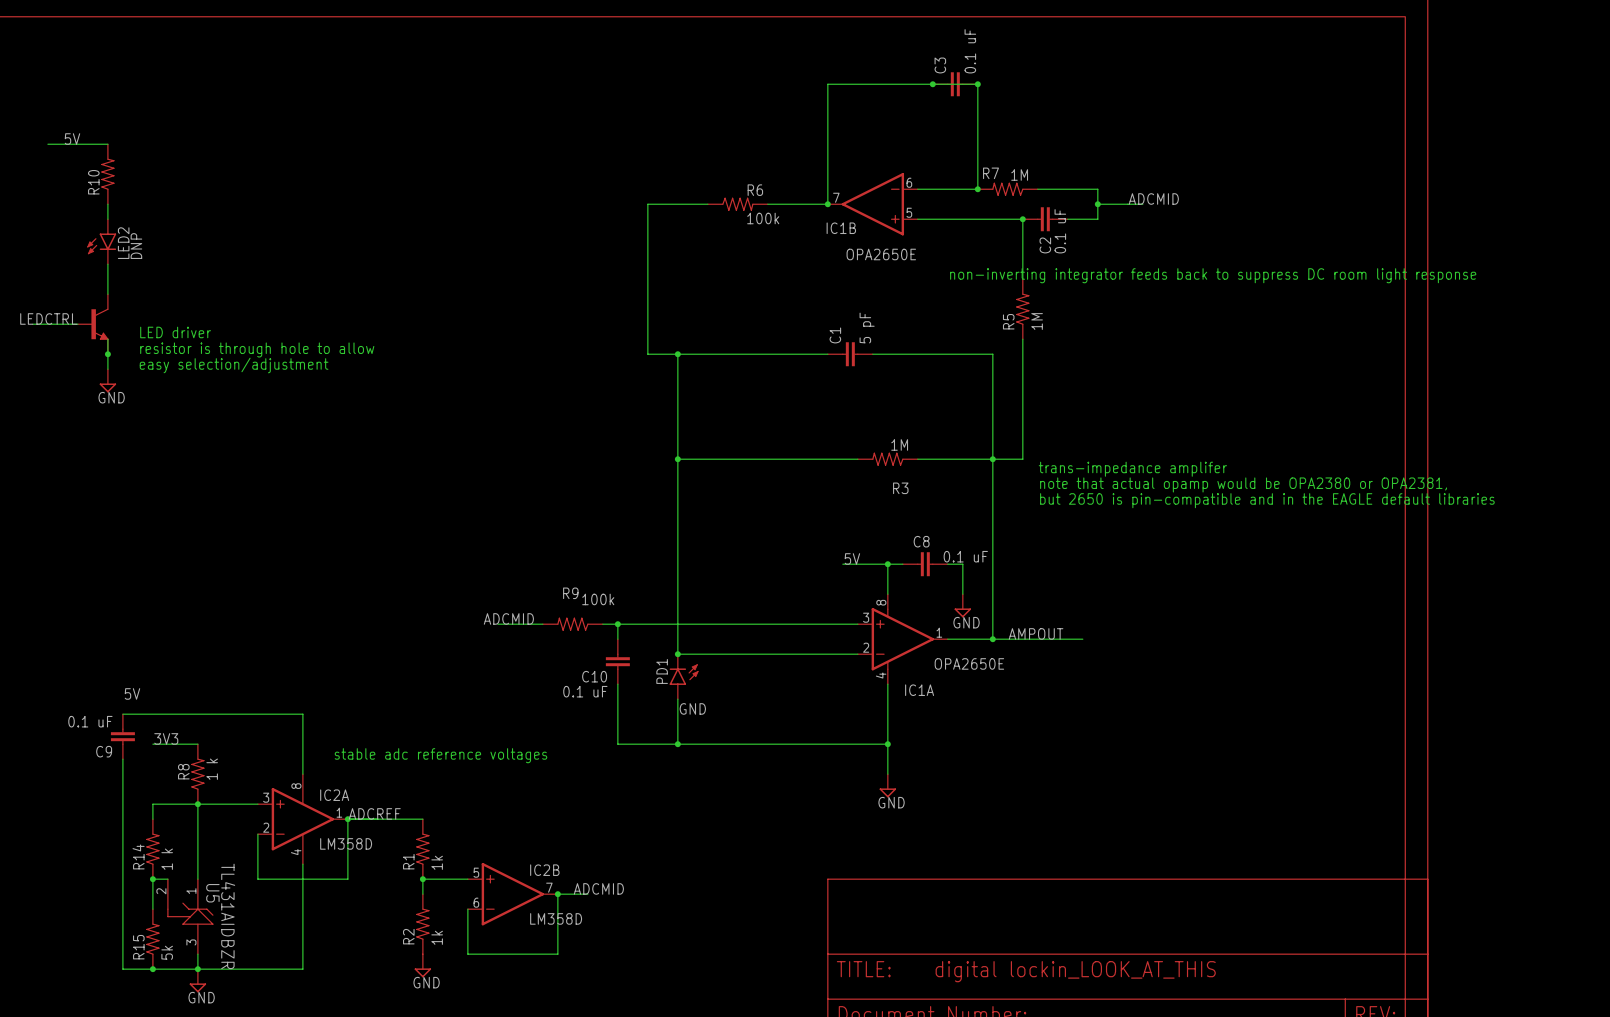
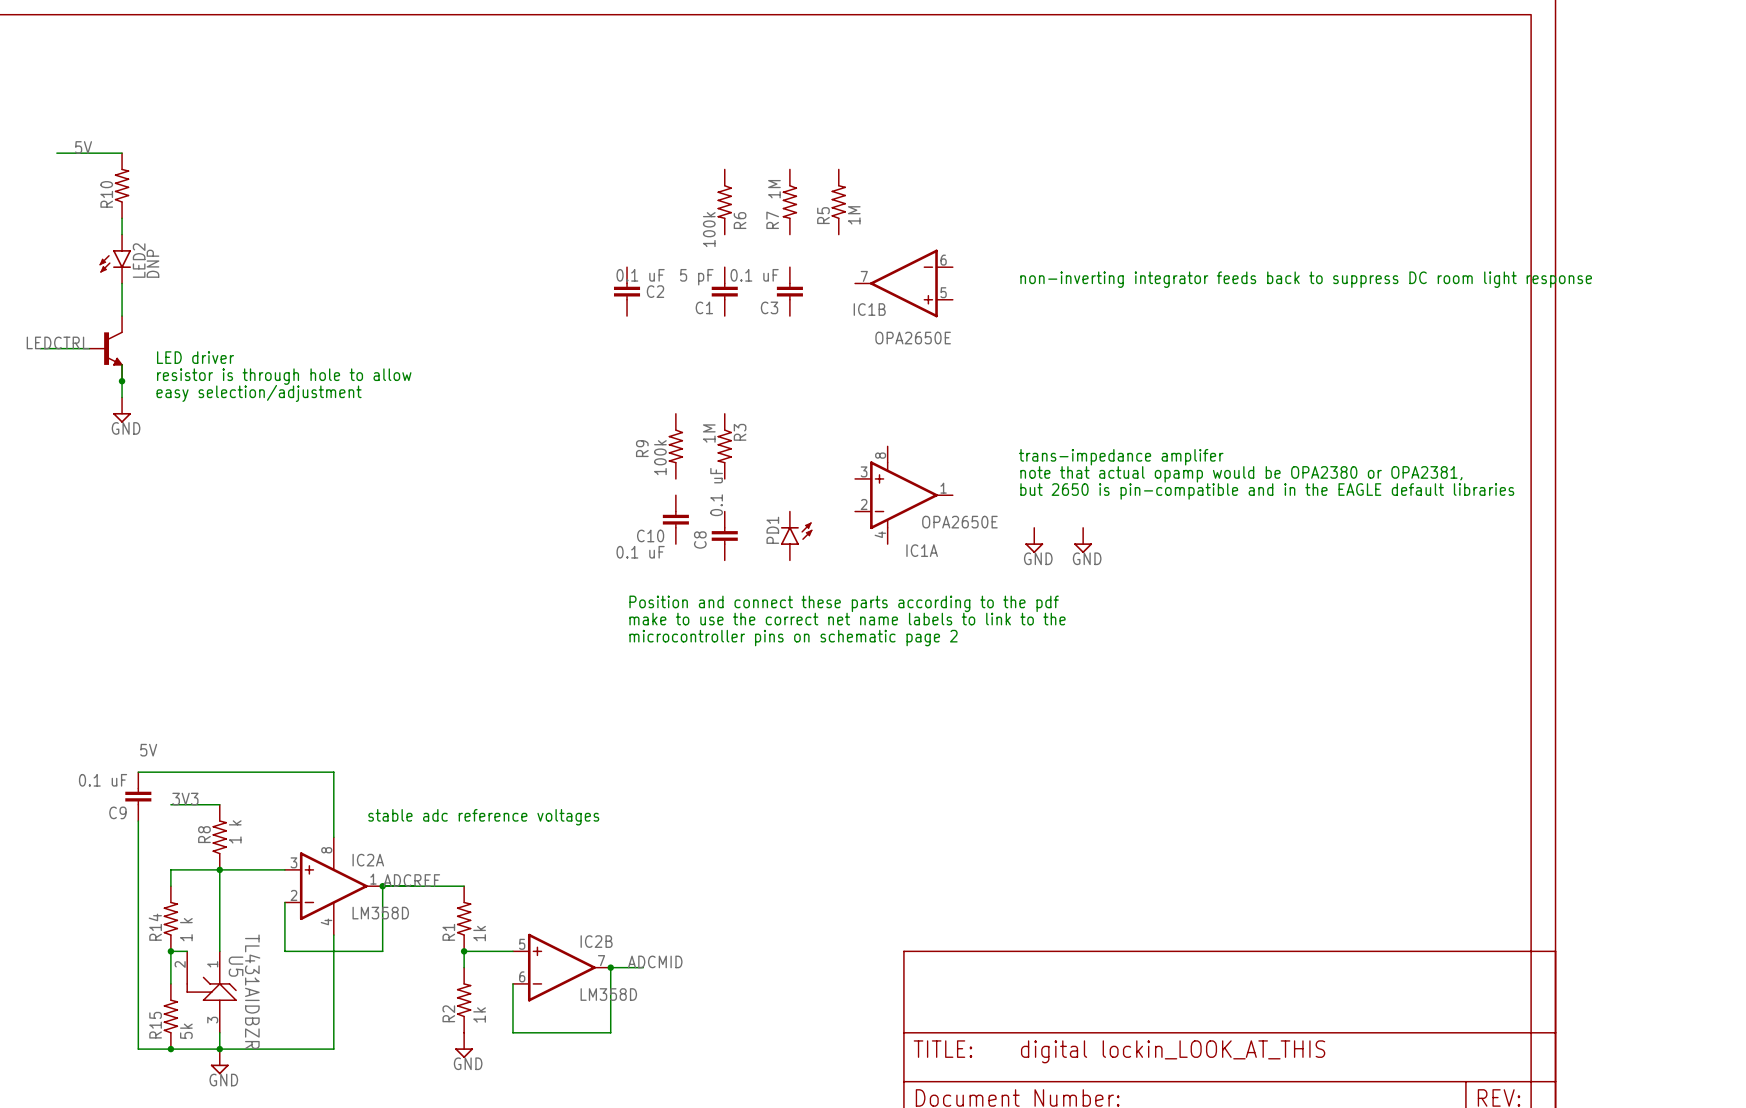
C3 value position: 0.1 uF (970, 51) -> 0.1 uF (754, 275)
C3 name position: C3 (940, 65) -> C3 (769, 307)
junction: (932, 84) -> none
C3 rotation: 0° (955, 84) -> 90° clockwise (789, 291)
C3 position: (955, 84) -> (789, 291)
junction: (977, 84) -> none
wire: (917, 189) (977, 189) (977, 84) (827, 84) (827, 204) (767, 204) -> none
junction: (977, 189) -> none
R7 rotation: 0° (1007, 189) -> 90° counterclockwise (789, 202)
R7 position: (1007, 189) -> (789, 202)
wire: (1037, 189) (1097, 189) (1097, 219) (1067, 219) -> none
label: ADCMID (1153, 198) -> none
wire: (707, 204) (647, 204) (647, 354) (827, 354) -> none
R6 rotation: 0° (737, 204) -> 90° clockwise (724, 202)
R6 position: (737, 204) -> (724, 202)
junction: (827, 204) -> none
IC1B position: (872, 204) -> (903, 283)
wire: (1097, 204) (1142, 204) -> none
junction: (1097, 204) -> none
wire: (917, 219) (1022, 219) (1022, 279) -> none
junction: (1022, 219) -> none
C2 rotation: 0° (1045, 219) -> 90° clockwise (627, 291)
C2 position: (1045, 219) -> (627, 291)
C2 value position: 0.1 uF (1060, 231) -> 0.1 uF (640, 275)
C2 name position: C2 (1045, 245) -> C2 (655, 291)
text position: non-inverting integrator feeds back to suppress DC room light response (1213, 275) -> non-inverting integrator feeds back to suppress DC room light response (1306, 279)
R5 position: (1022, 309) -> (838, 202)
C1 value position: 5 pF (867, 328) -> 5 pF (696, 277)
C1 name position: C1 (835, 335) -> C1 (704, 307)
wire: (1022, 339) (1022, 459) (917, 459) -> none
wire: (677, 354) (677, 654) (857, 654) -> none
junction: (677, 354) -> none
C1 rotation: 0° (850, 354) -> 90° clockwise (724, 291)
C1 position: (850, 354) -> (724, 291)
wire: (872, 354) (992, 354) (992, 639) -> none
wire: (677, 459) (857, 459) -> none
junction: (677, 459) -> none
R3 rotation: 0° (887, 459) -> 90° counterclockwise (724, 446)
R3 position: (887, 459) -> (724, 446)
junction: (992, 459) -> none
text position: trans-impedance amplifer (1132, 469) -> trans-impedance amplifer (1121, 457)
text position: note that actual opamp would be OPA2380 or OPA2381, (1243, 484) -> note that actual opamp would be OPA2380 or OPA2381, (1241, 474)
R3 name position: R3 (900, 488) -> R3 (740, 432)
power symbol: none -> GND (1034, 540)
power symbol: none -> GND (1083, 540)
text position: but 2650 is pin-compatible and in the EAGLE default libraries (1267, 500) -> but 2650 is pin-compatible and in the EAGLE default libraries (1267, 491)
C8 name position: C8 (921, 541) -> C8 (700, 540)
C8 value position: 0.1 uF (965, 556) -> 0.1 uF (716, 492)
label: 5V (852, 558) -> none
text: none -> Position and connect these parts according to the pdf (844, 603)
wire: (842, 564) (902, 564) -> none
wire: (887, 564) (887, 594) -> none
junction: (887, 564) -> none
C8 rotation: 0° (925, 564) -> 90° clockwise (724, 535)
C8 position: (925, 564) -> (724, 535)
wire: (947, 564) (962, 564) (962, 594) -> none
text: none -> make to use the correct net name labels to link to the (847, 619)
text: none -> microcontroller pins on schematic page 2 (793, 638)
R9 value position: 100k (598, 599) -> 100k (660, 457)
power symbol: GND (962, 605) -> none
label: ADCMID (508, 618) -> none
wire: (497, 624) (542, 624) -> none
R9 rotation: 0° (572, 624) -> 90° counterclockwise (675, 446)
R9 position: (572, 624) -> (675, 446)
wire: (602, 624) (857, 624) -> none
wire: (617, 624) (617, 639) -> none
junction: (617, 624) -> none
label: AMPOUT (1036, 633) -> none
IC1A position: (902, 639) -> (903, 495)
wire: (947, 639) (1082, 639) -> none
junction: (992, 639) -> none
junction: (677, 654) -> none
C10 position: (617, 661) -> (675, 519)
IC1A value position: OPA2650E (969, 663) -> OPA2650E (959, 522)
PD1 position: (684, 676) -> (796, 535)
wire: (617, 684) (617, 744) (887, 744) -> none
wire: (887, 684) (887, 774) -> none
wire: (677, 699) (677, 744) -> none
label: GND (692, 708) -> none
junction: (677, 744) -> none
junction: (887, 744) -> none
power symbol: GND (887, 785) -> none

